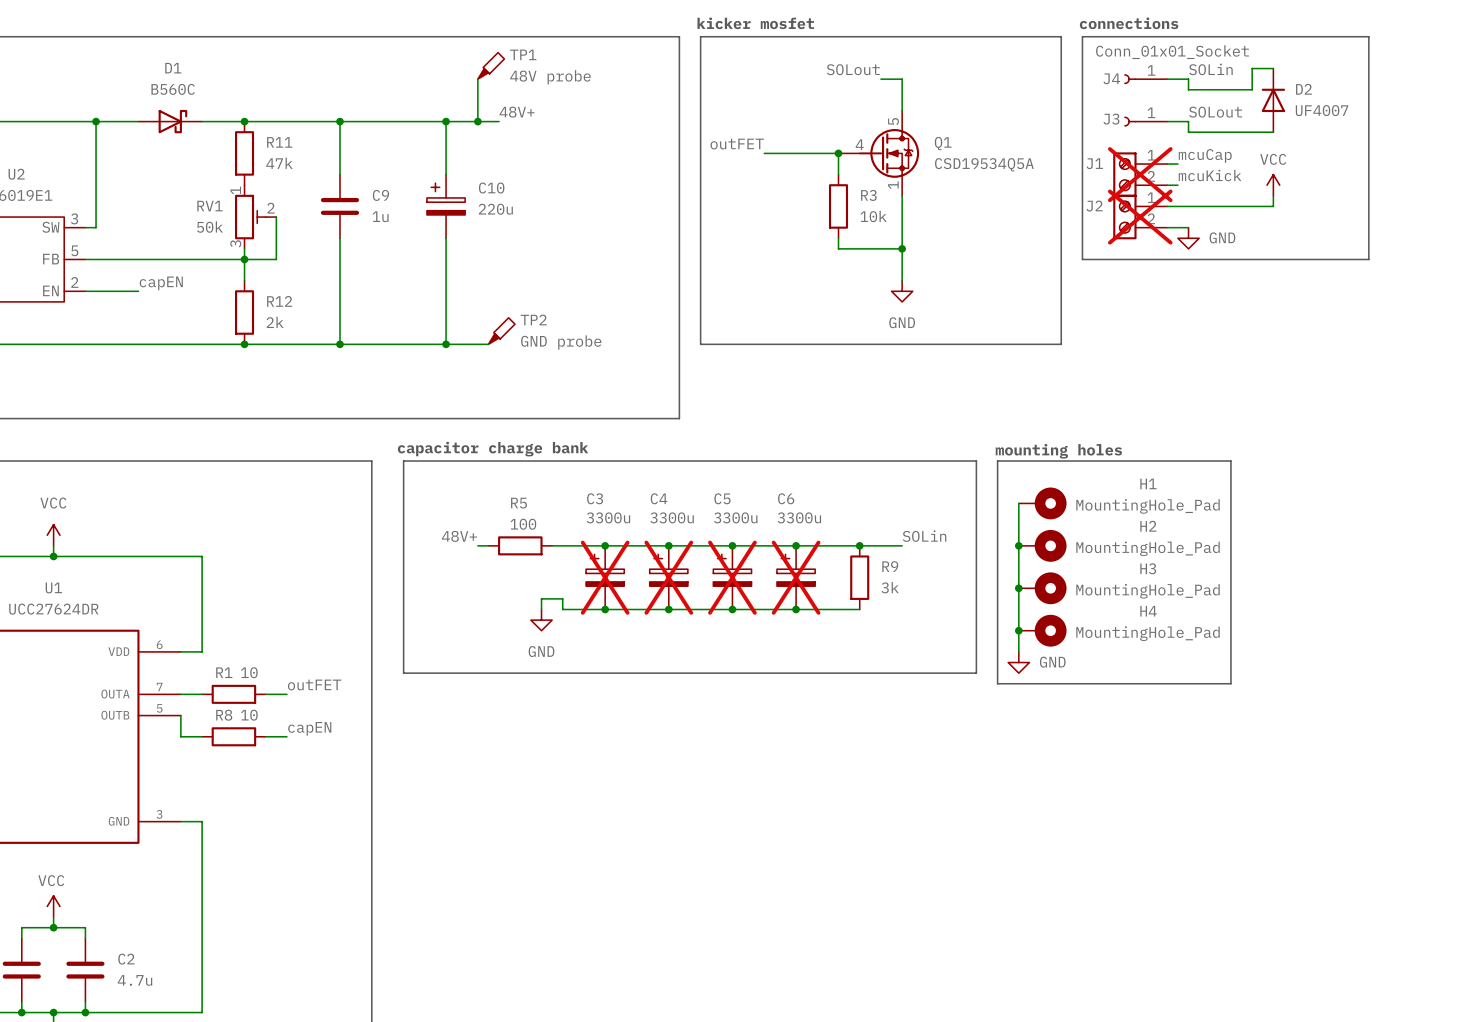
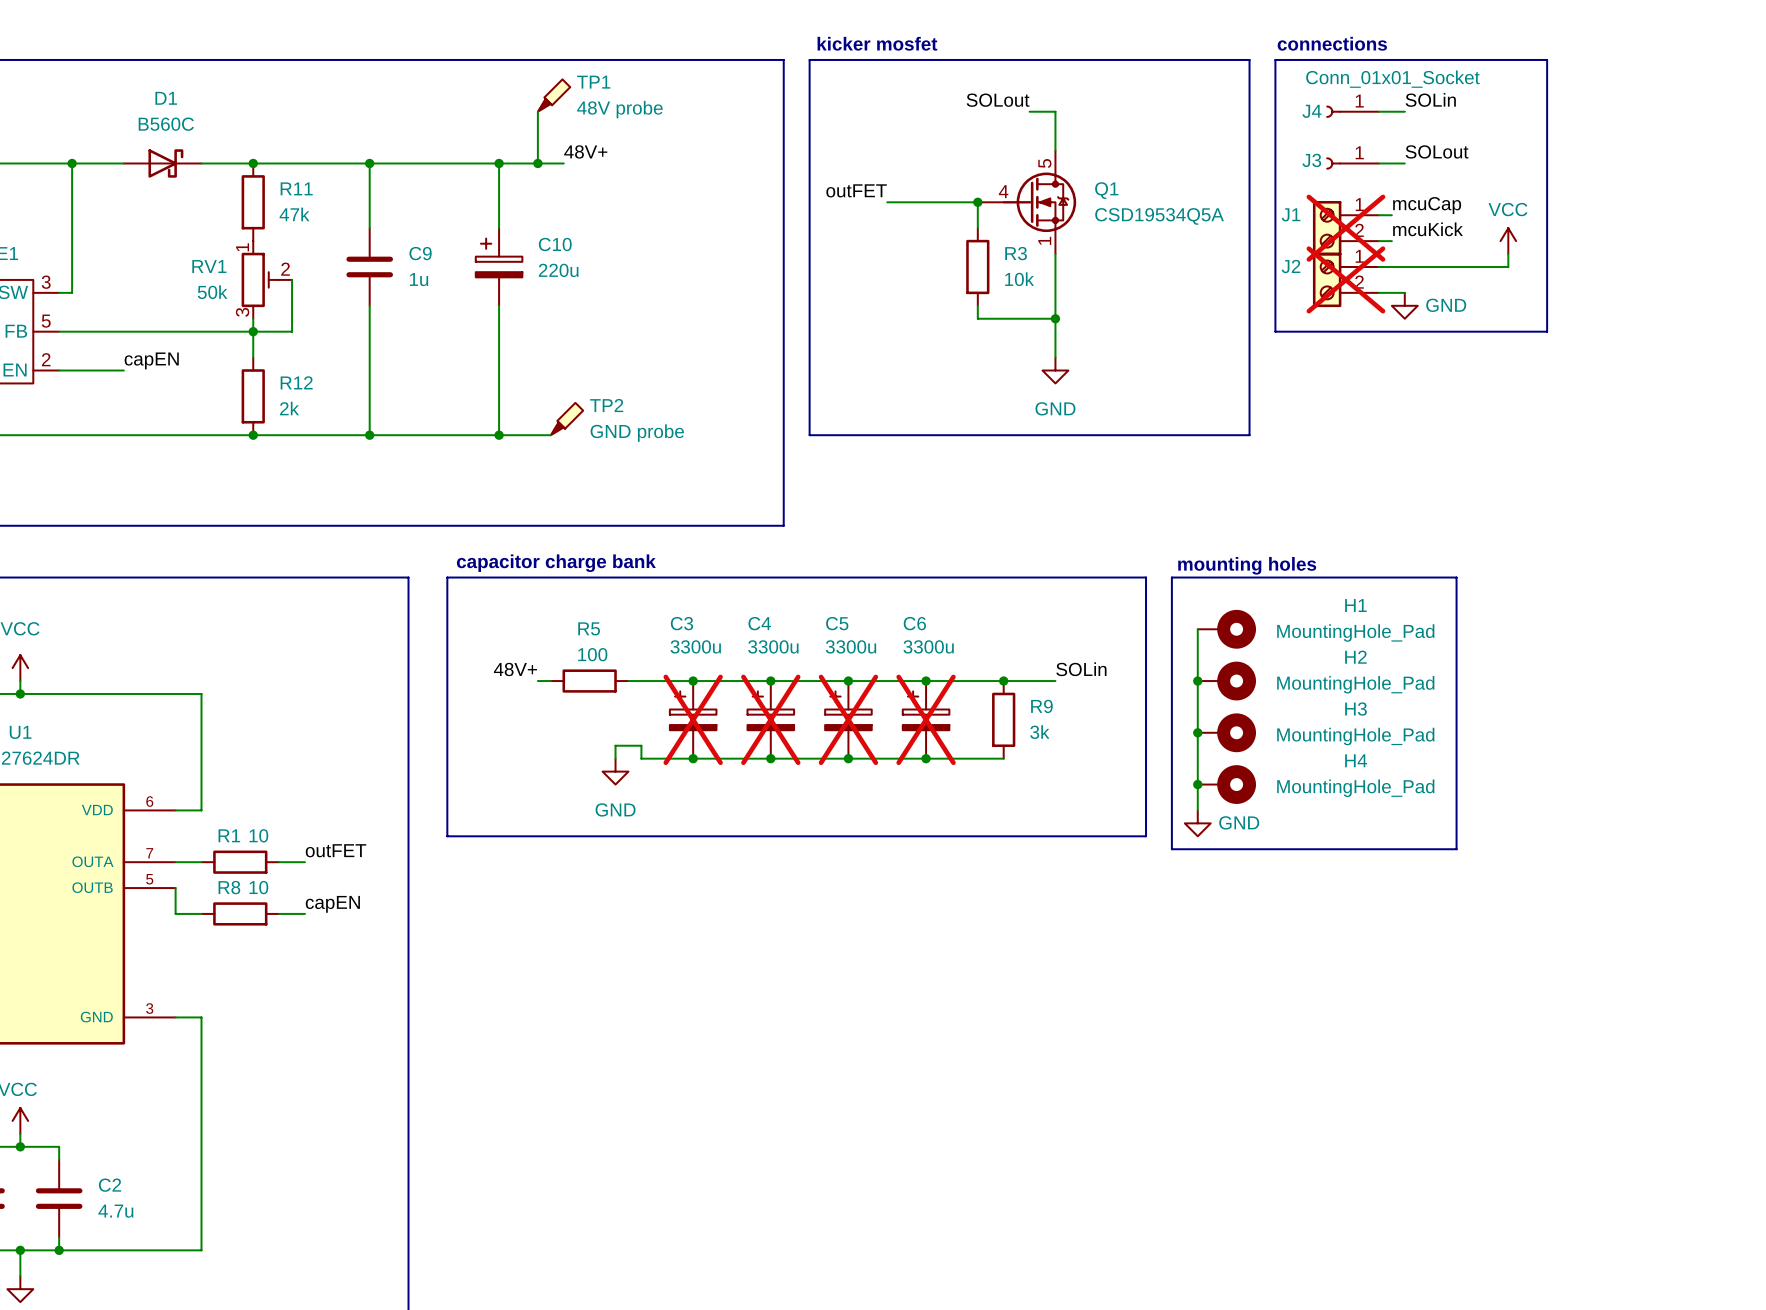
line: (1305, 36) (1368, 36) (1368, 259) (1305, 259) -> (1547, 59) (1547, 331)
wire: (1273, 68) (1252, 68) (1252, 89) (1188, 89) (1188, 79) -> none
D2: UF4007 (1273, 100) -> none
wire: (1188, 121) (1188, 132) (1273, 132) -> none

